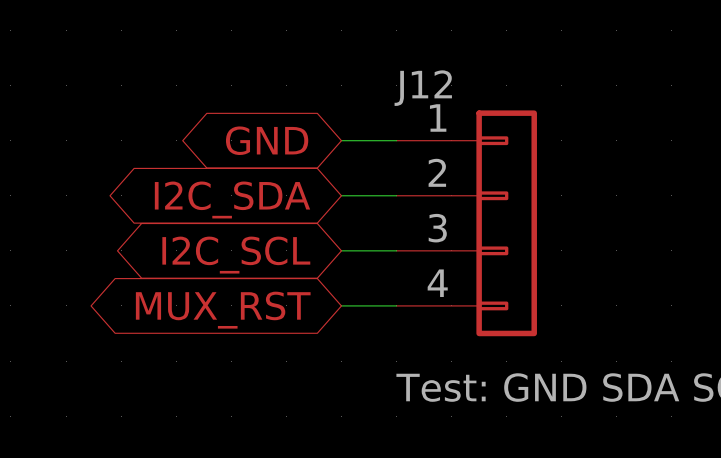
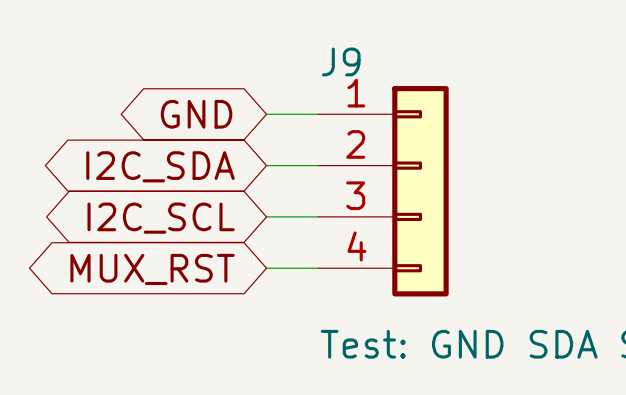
J12 name: J12 (423, 88) -> J9 (341, 62)

